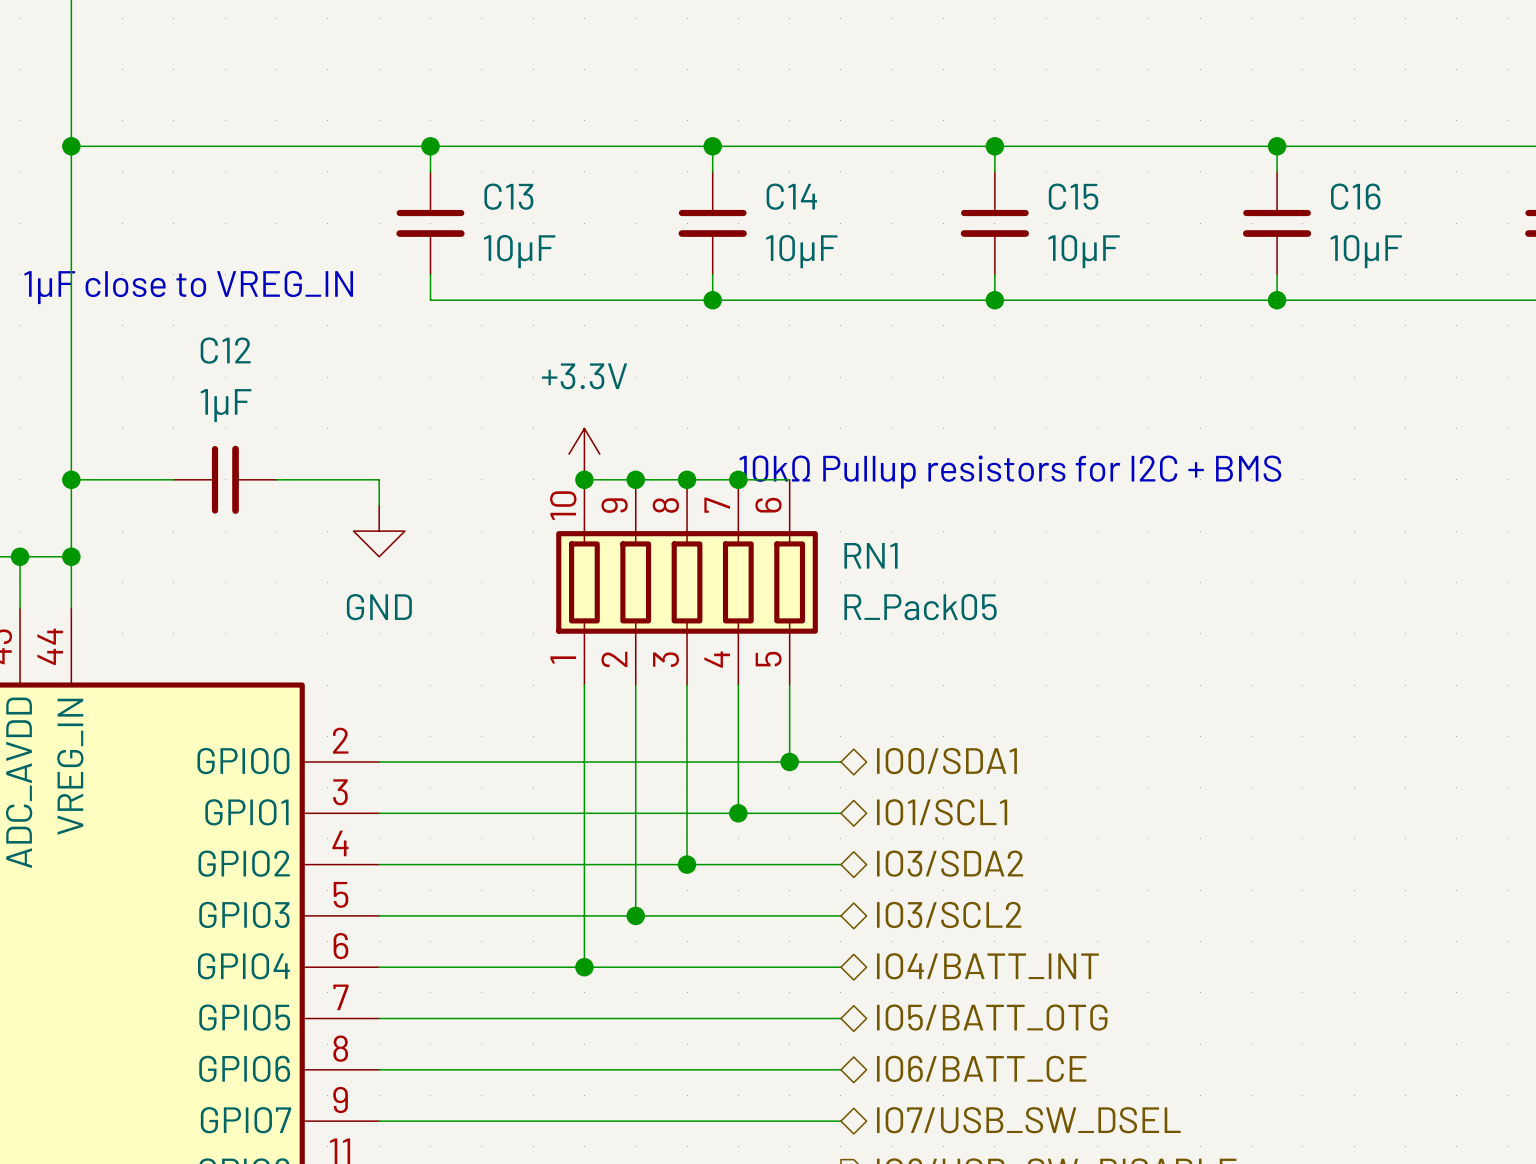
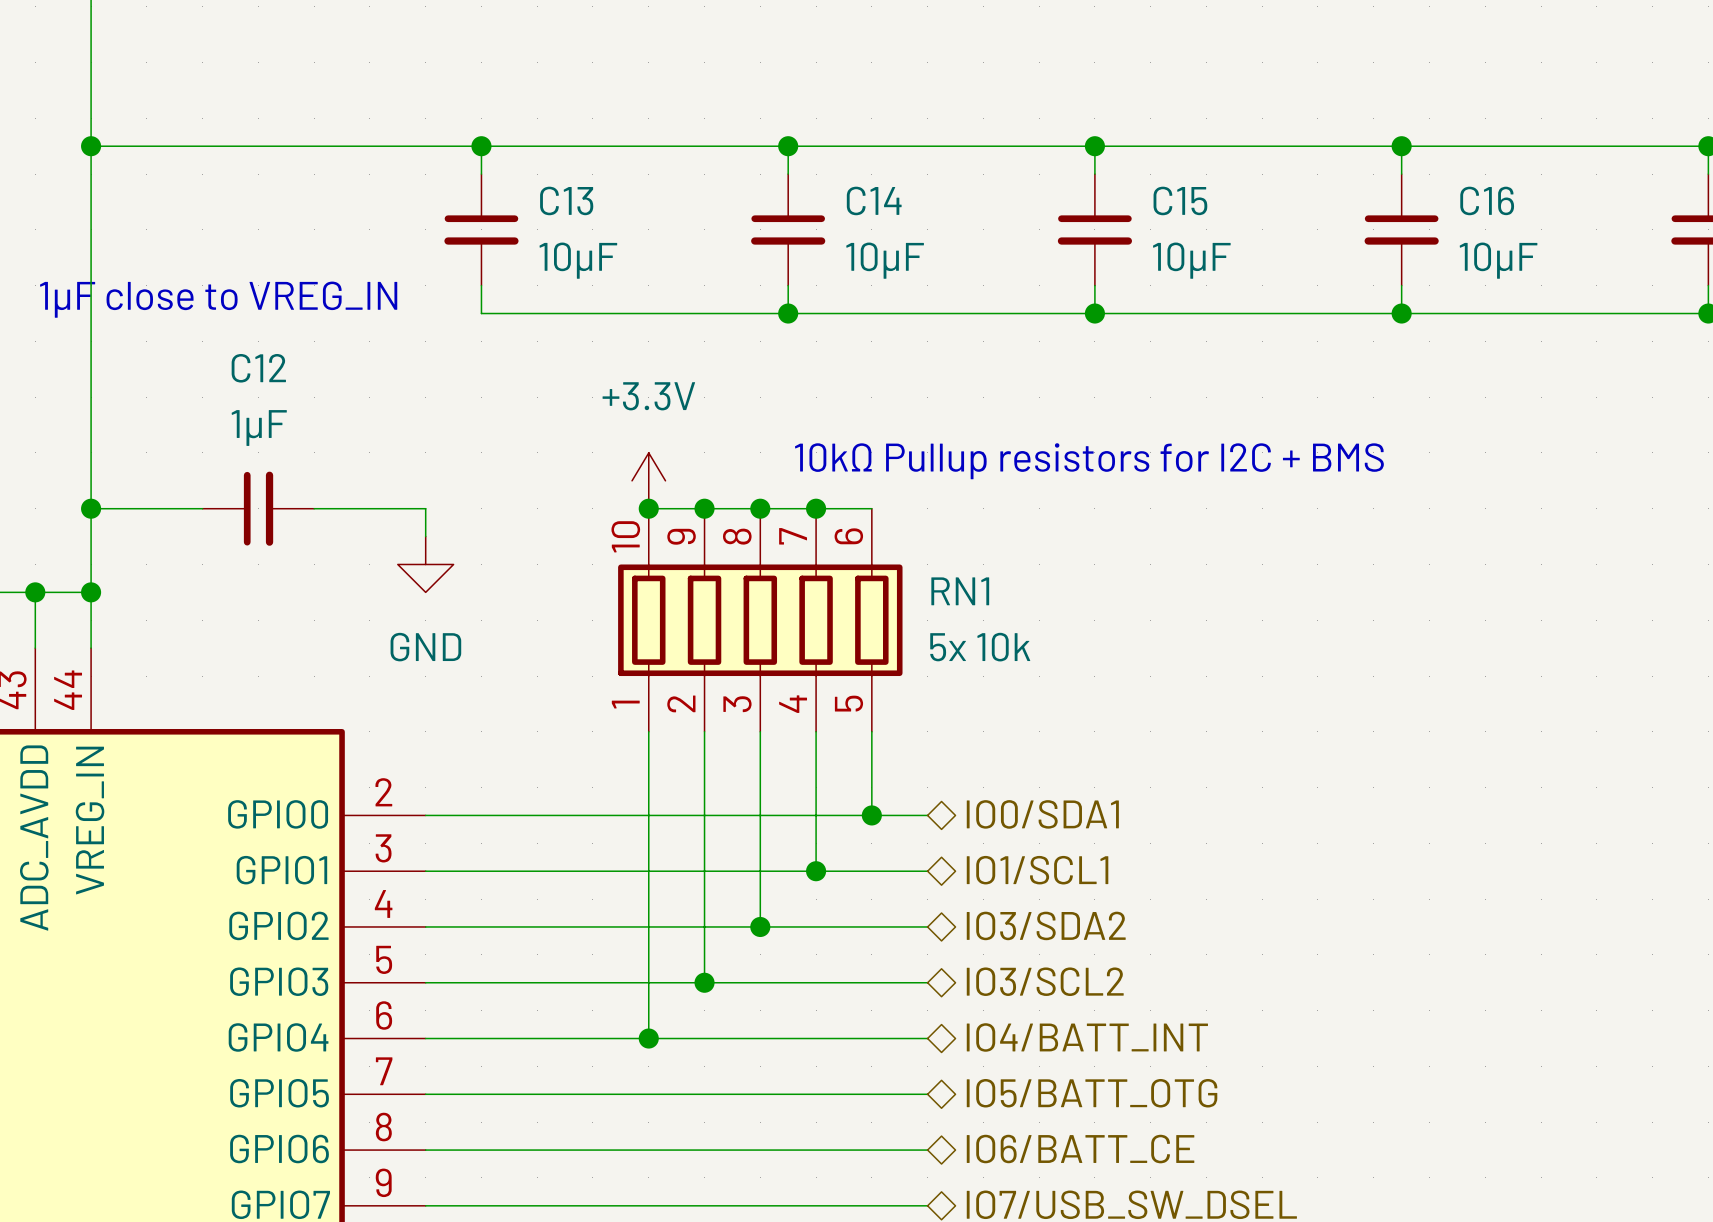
text position: 10kΩ Pullup resistors for I2C + BMS (1010, 472) -> 10kΩ Pullup resistors for I2C + BMS (1089, 461)
RN1 value: R_Pack05 (920, 607) -> 5x 10k (980, 647)

